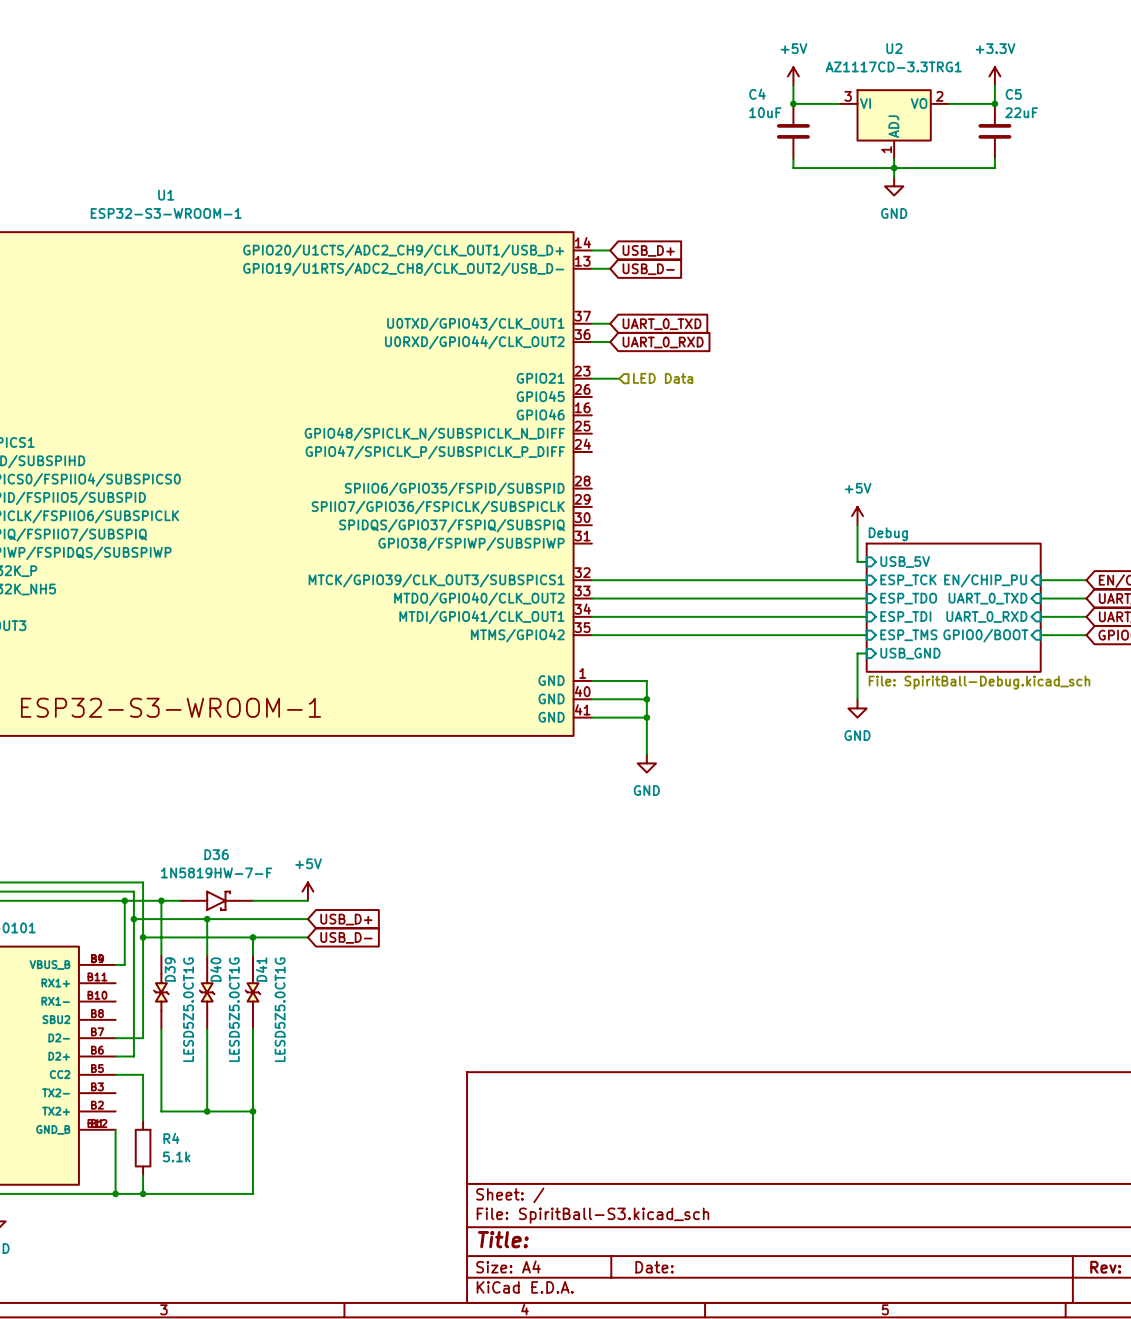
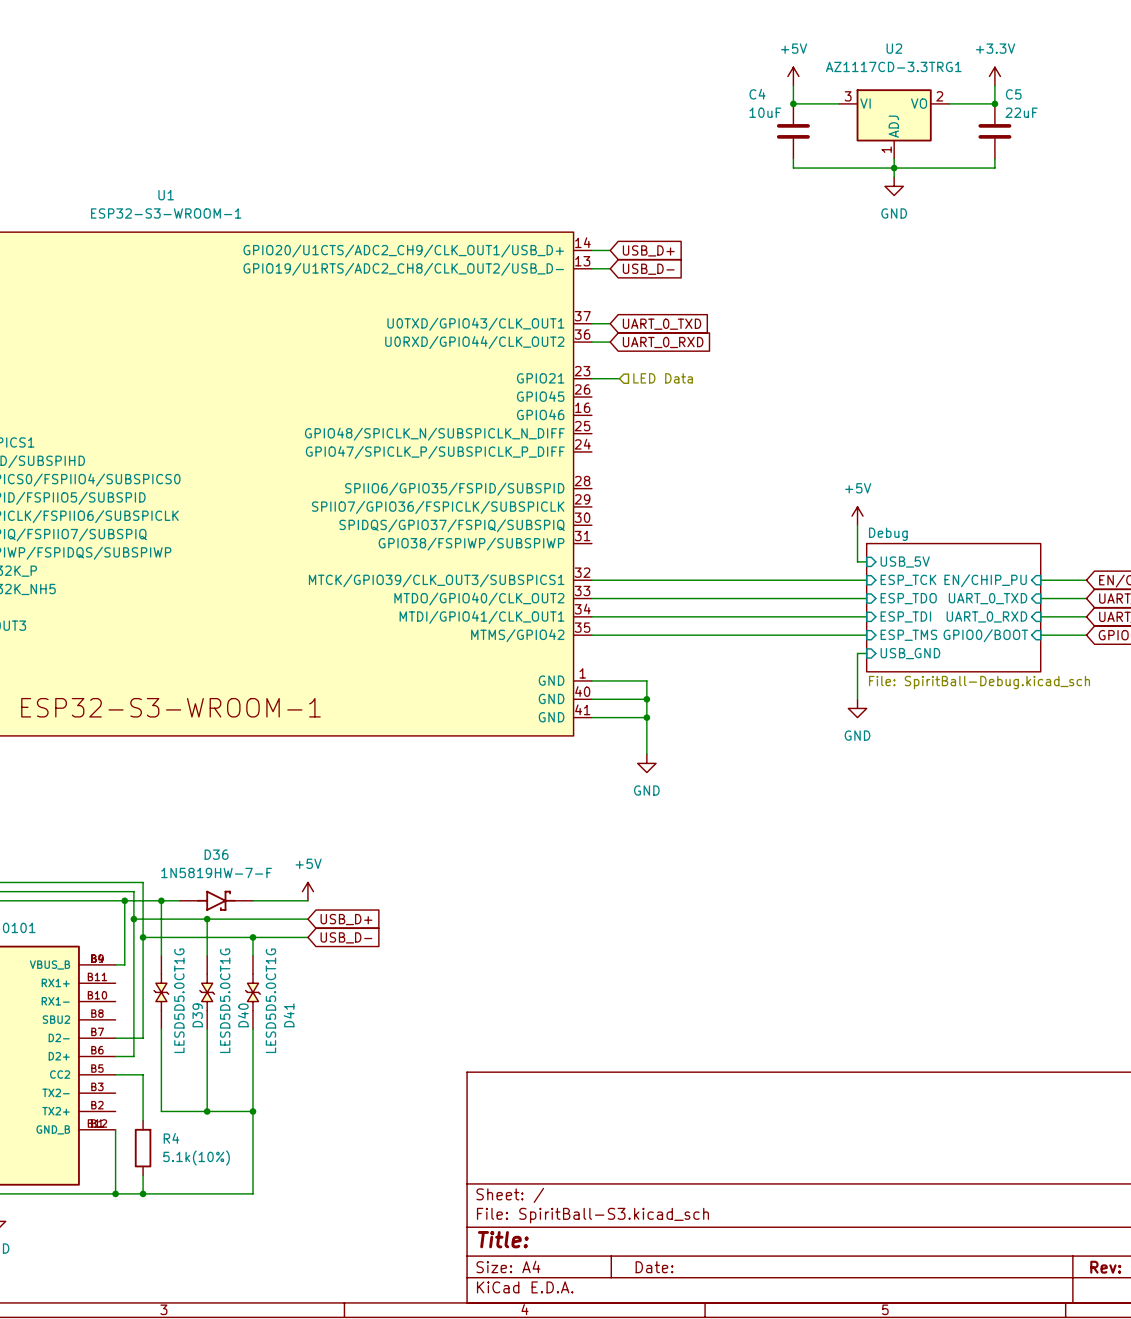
D39 name position: D39 (170, 969) -> D39 (197, 1015)
D40 name position: D40 (215, 969) -> D40 (243, 1015)
D41 name position: D41 (261, 969) -> D41 (289, 1015)
D39 value: LESD5Z5.0CT1G (188, 1009) -> LESD5D5.0CT1G (179, 1000)
D40 value: LESD5Z5.0CT1G (234, 1009) -> LESD5D5.0CT1G (225, 1000)
D41 value: LESD5Z5.0CT1G (280, 1009) -> LESD5D5.0CT1G (270, 1000)
R4 value: 5.1k (176, 1156) -> 5.1k(10%) (196, 1158)

